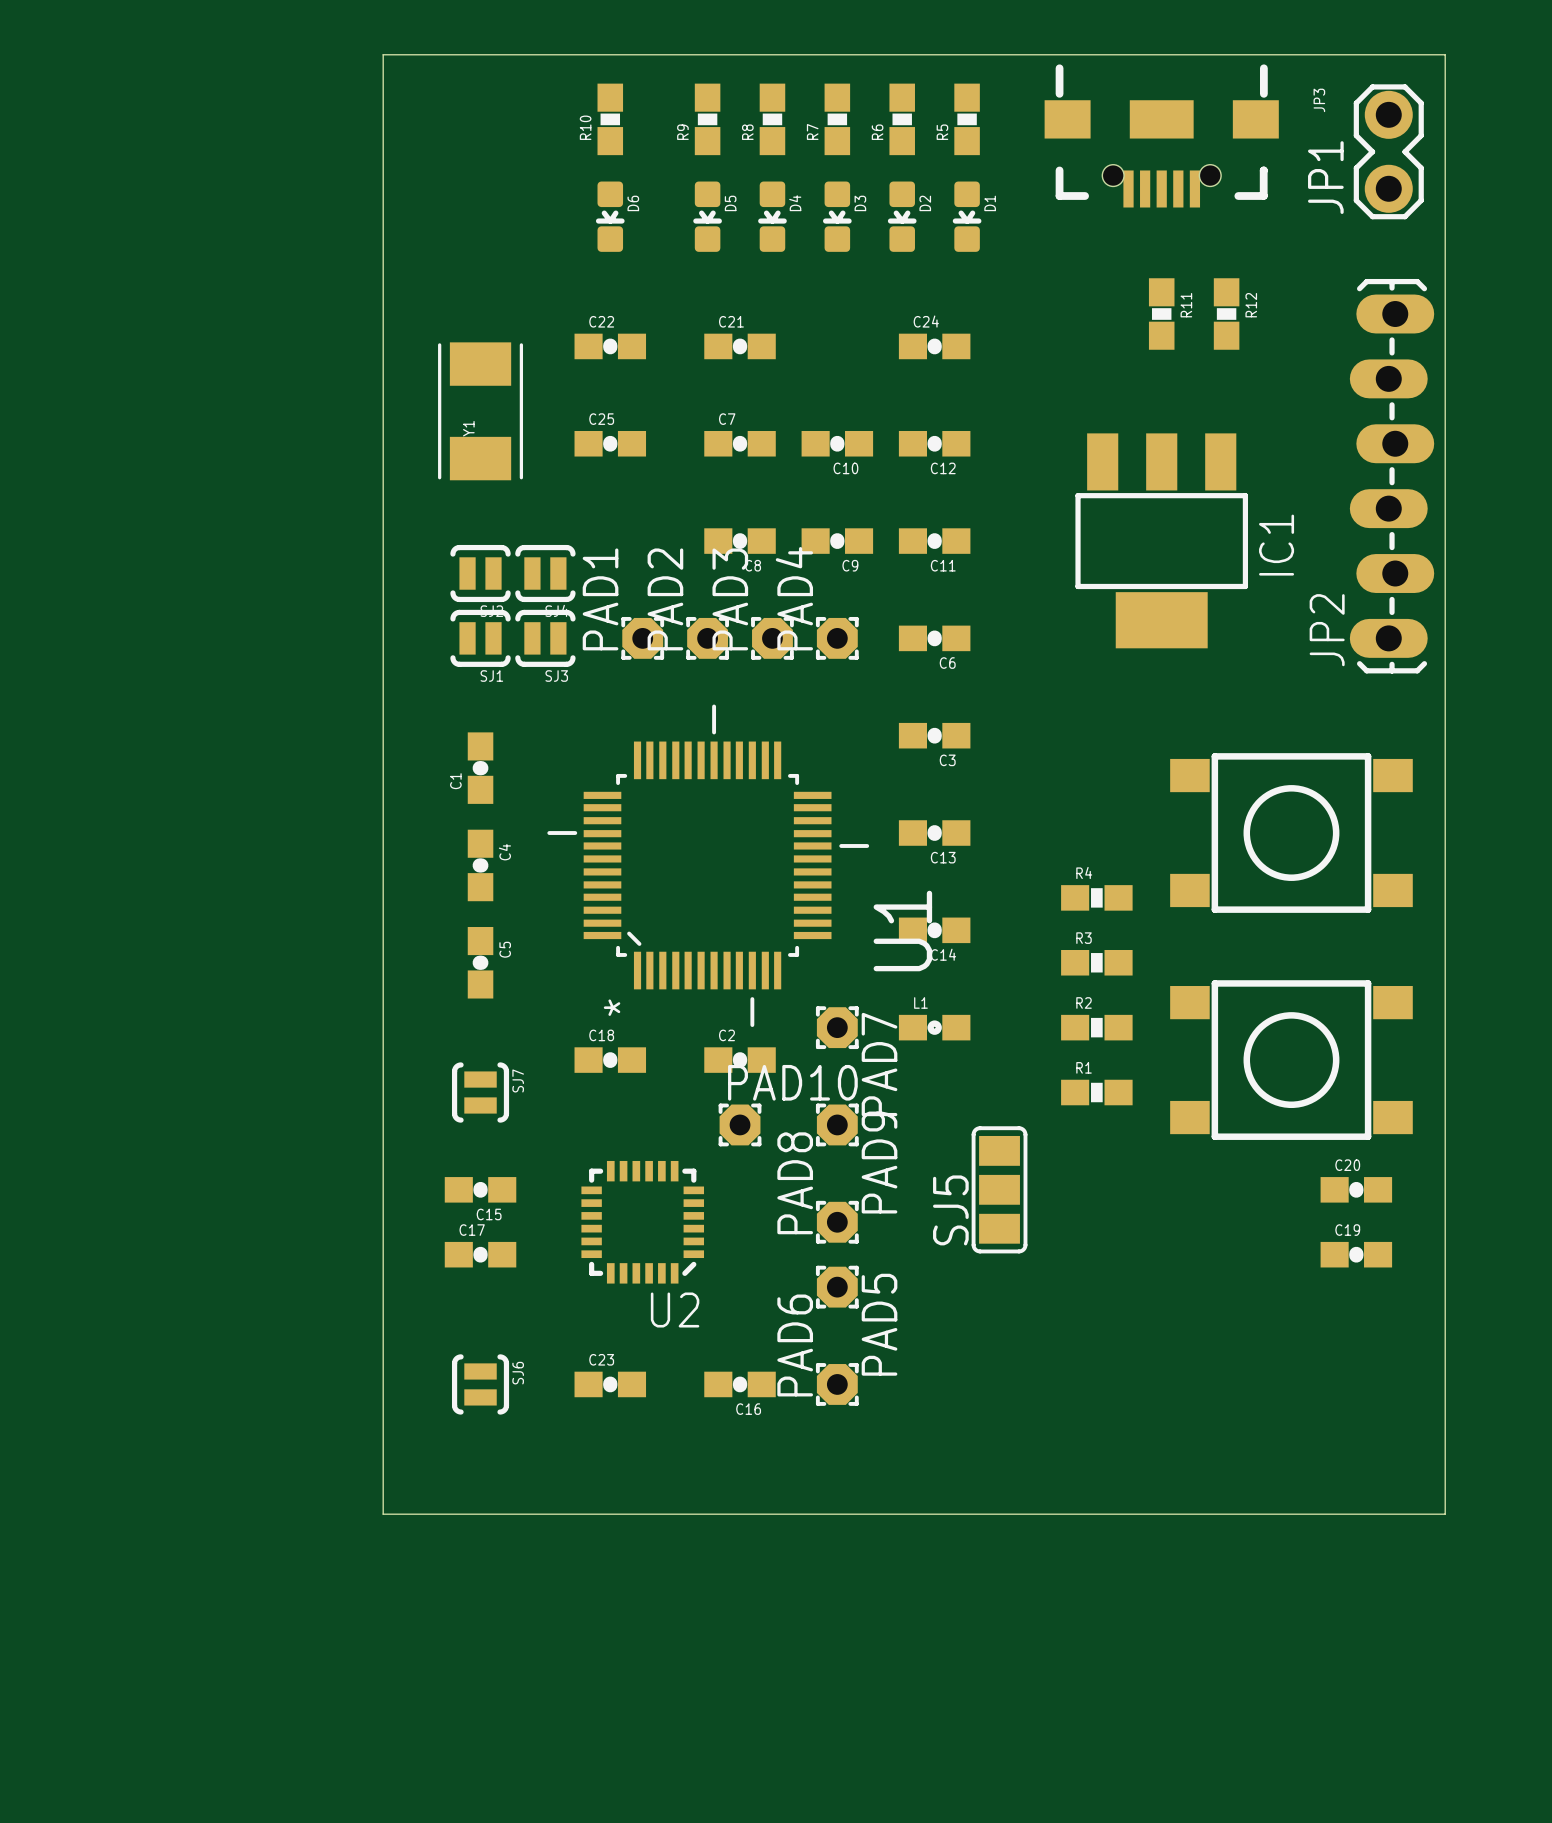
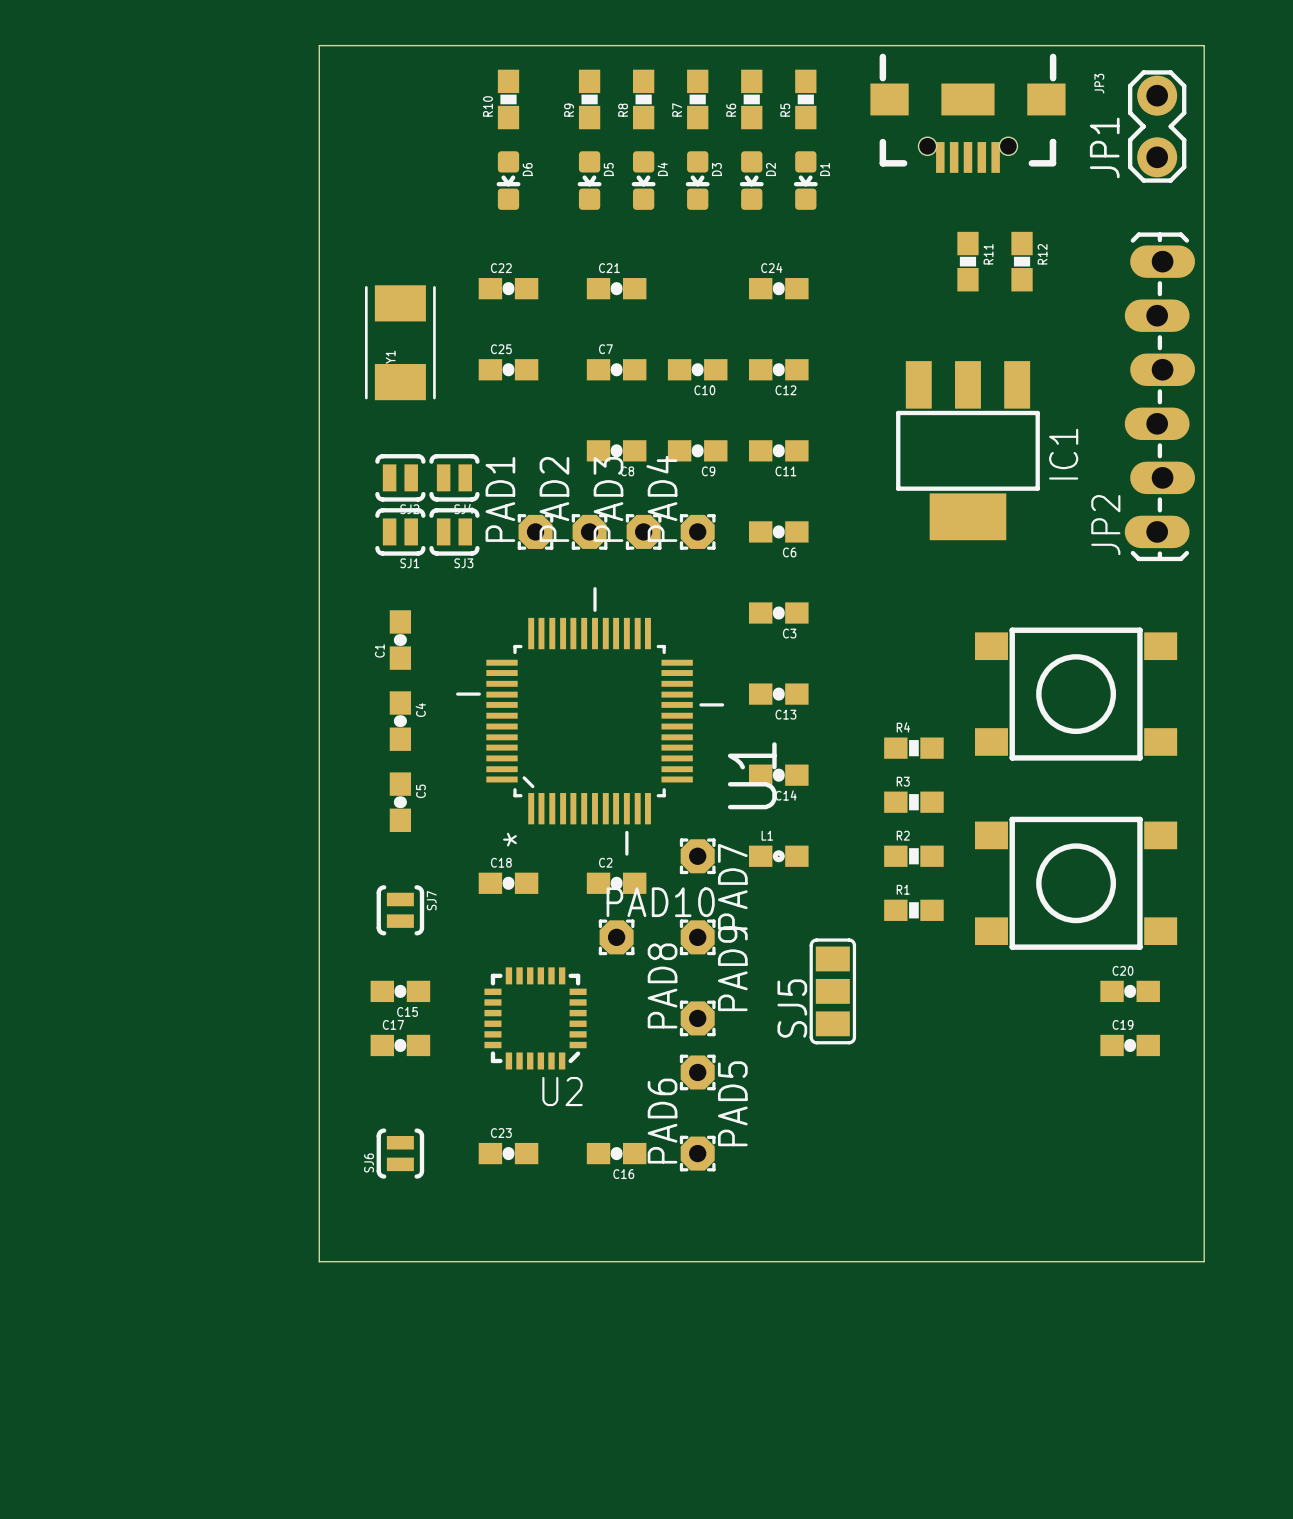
SJ6 name position: SJ6 (518, 1373) -> SJ6 (369, 1163)

